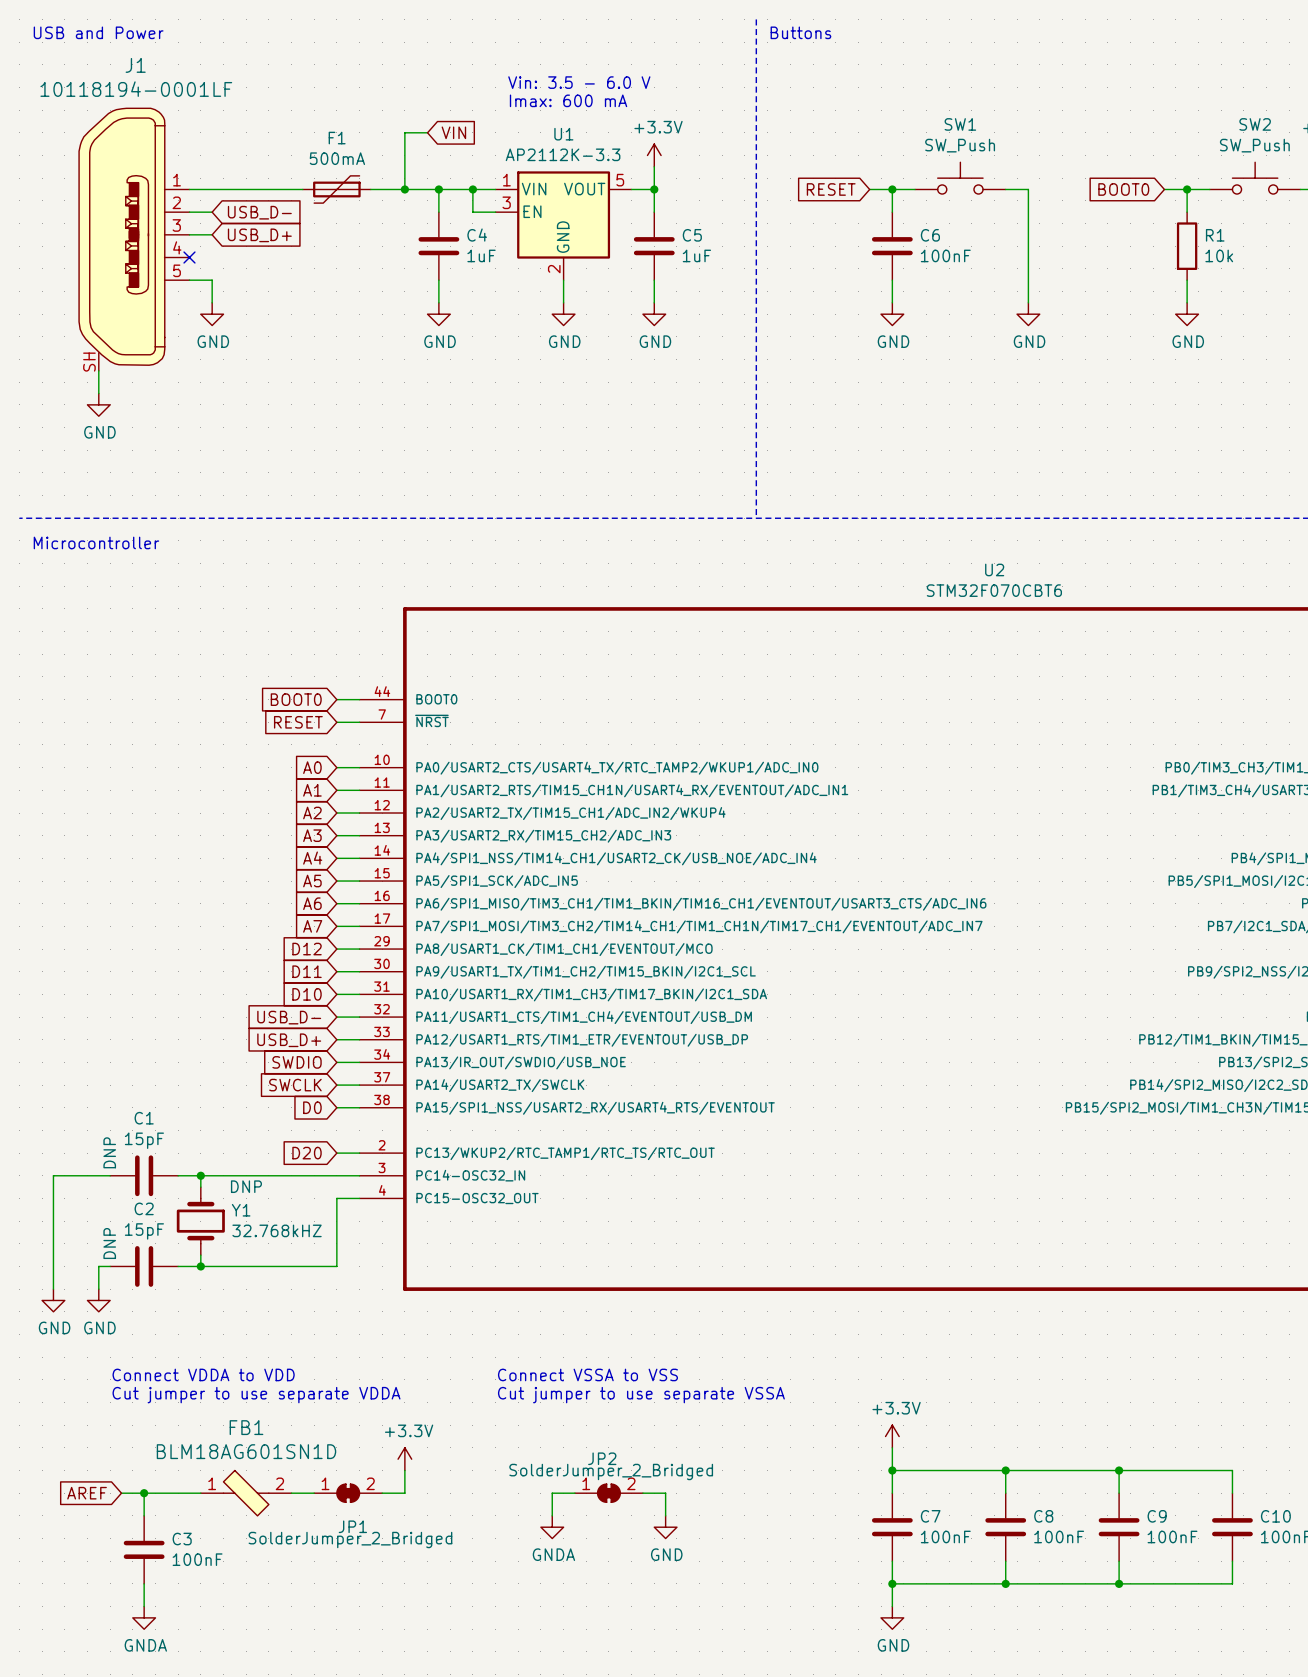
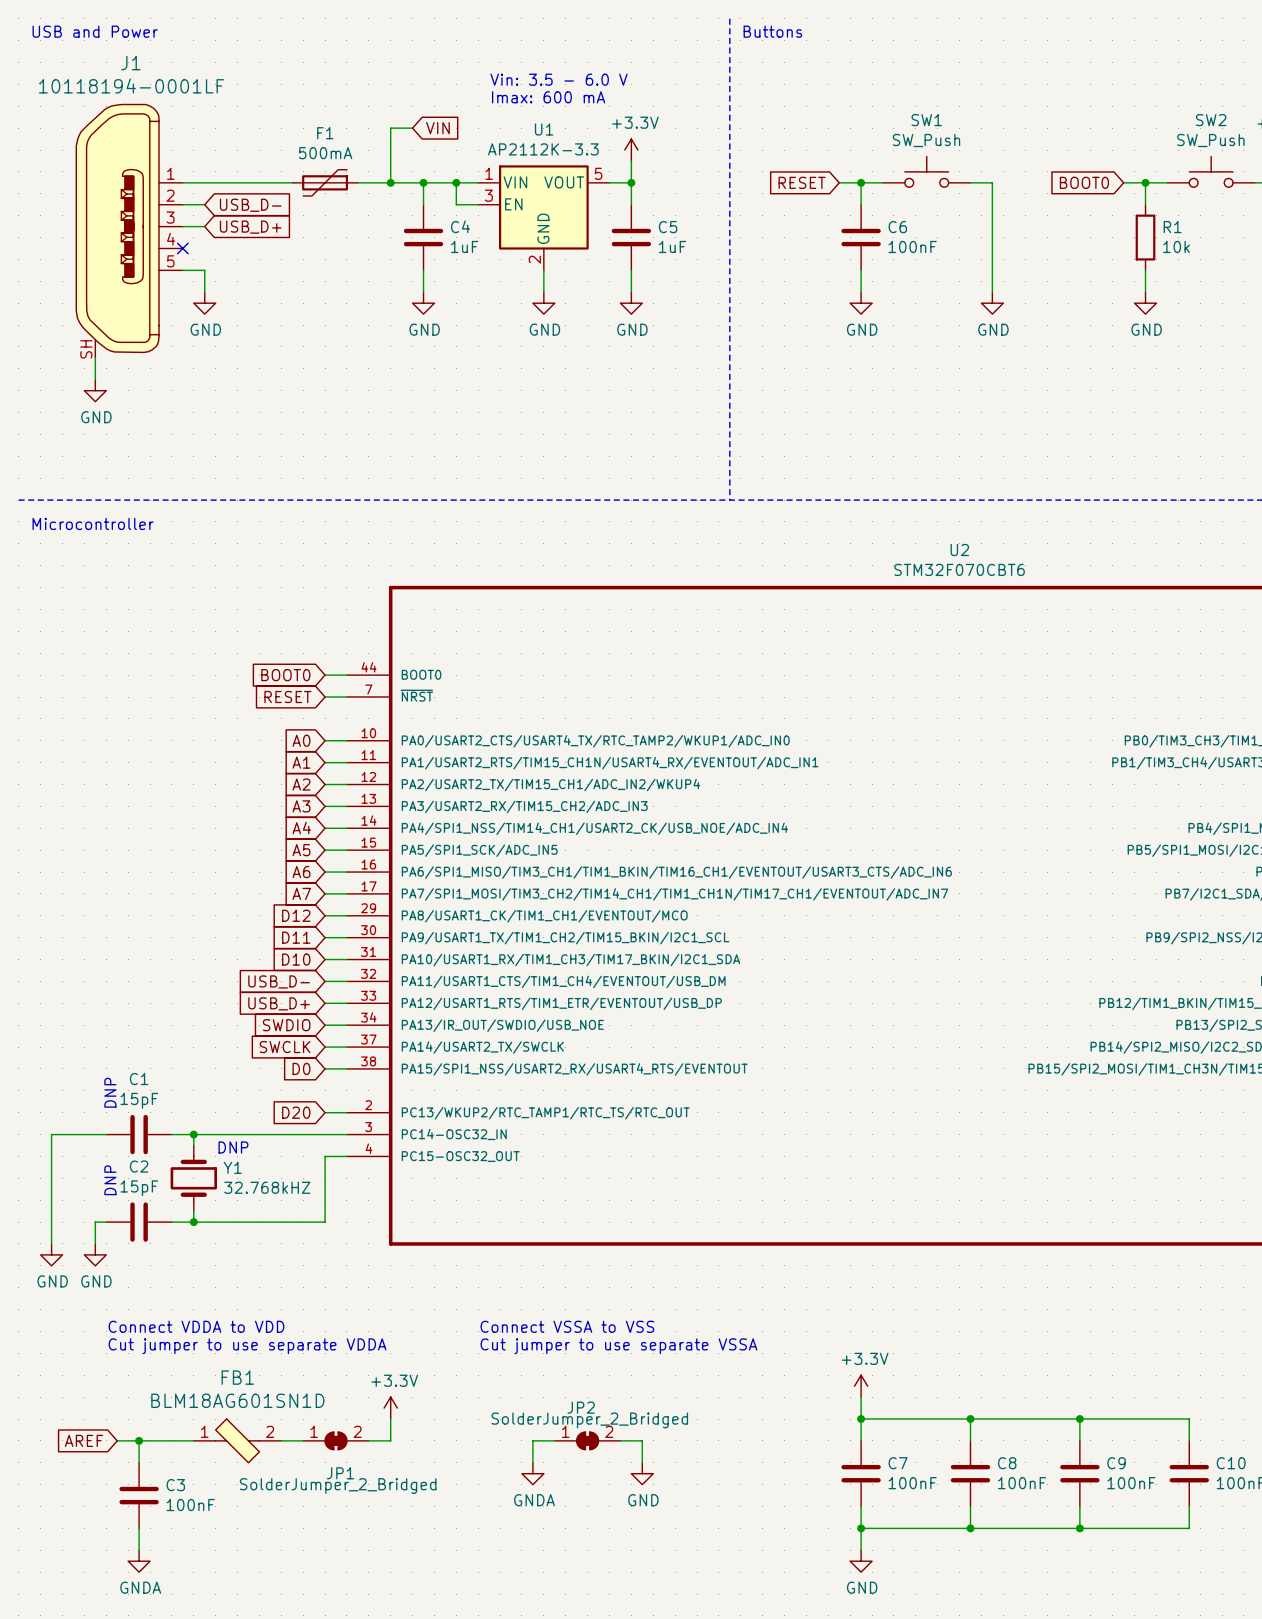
text: none -> DNP (110, 1092)
C1 text: DNP (109, 1152) -> none
Y1 text: DNP (246, 1186) -> none
text: none -> DNP (233, 1147)
text: none -> DNP (110, 1180)
C2 text: DNP (109, 1243) -> none

